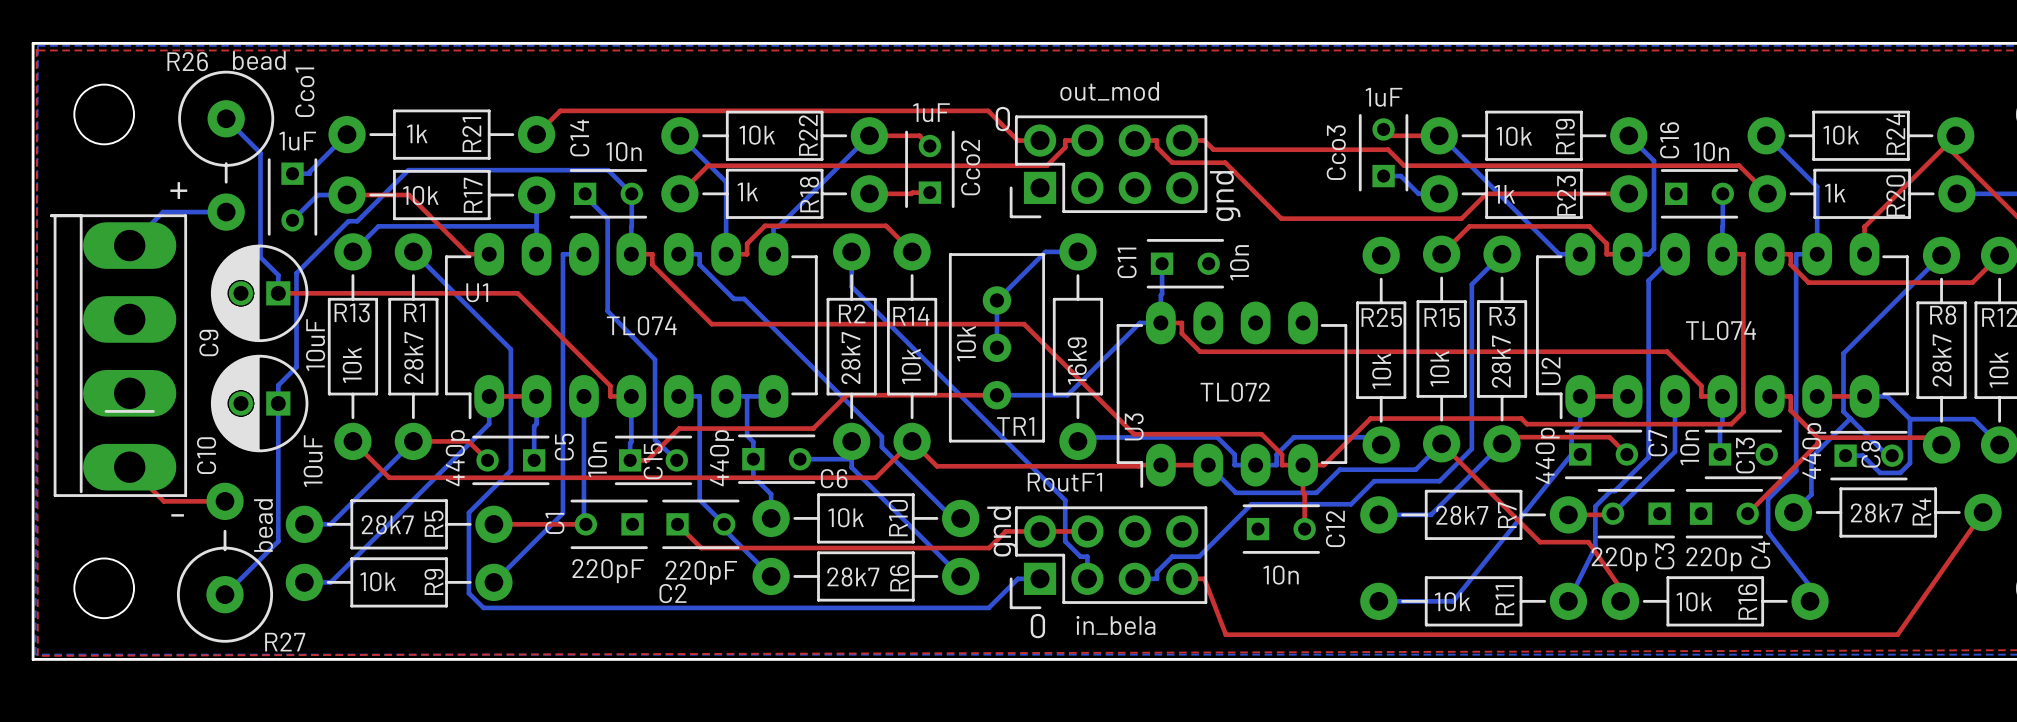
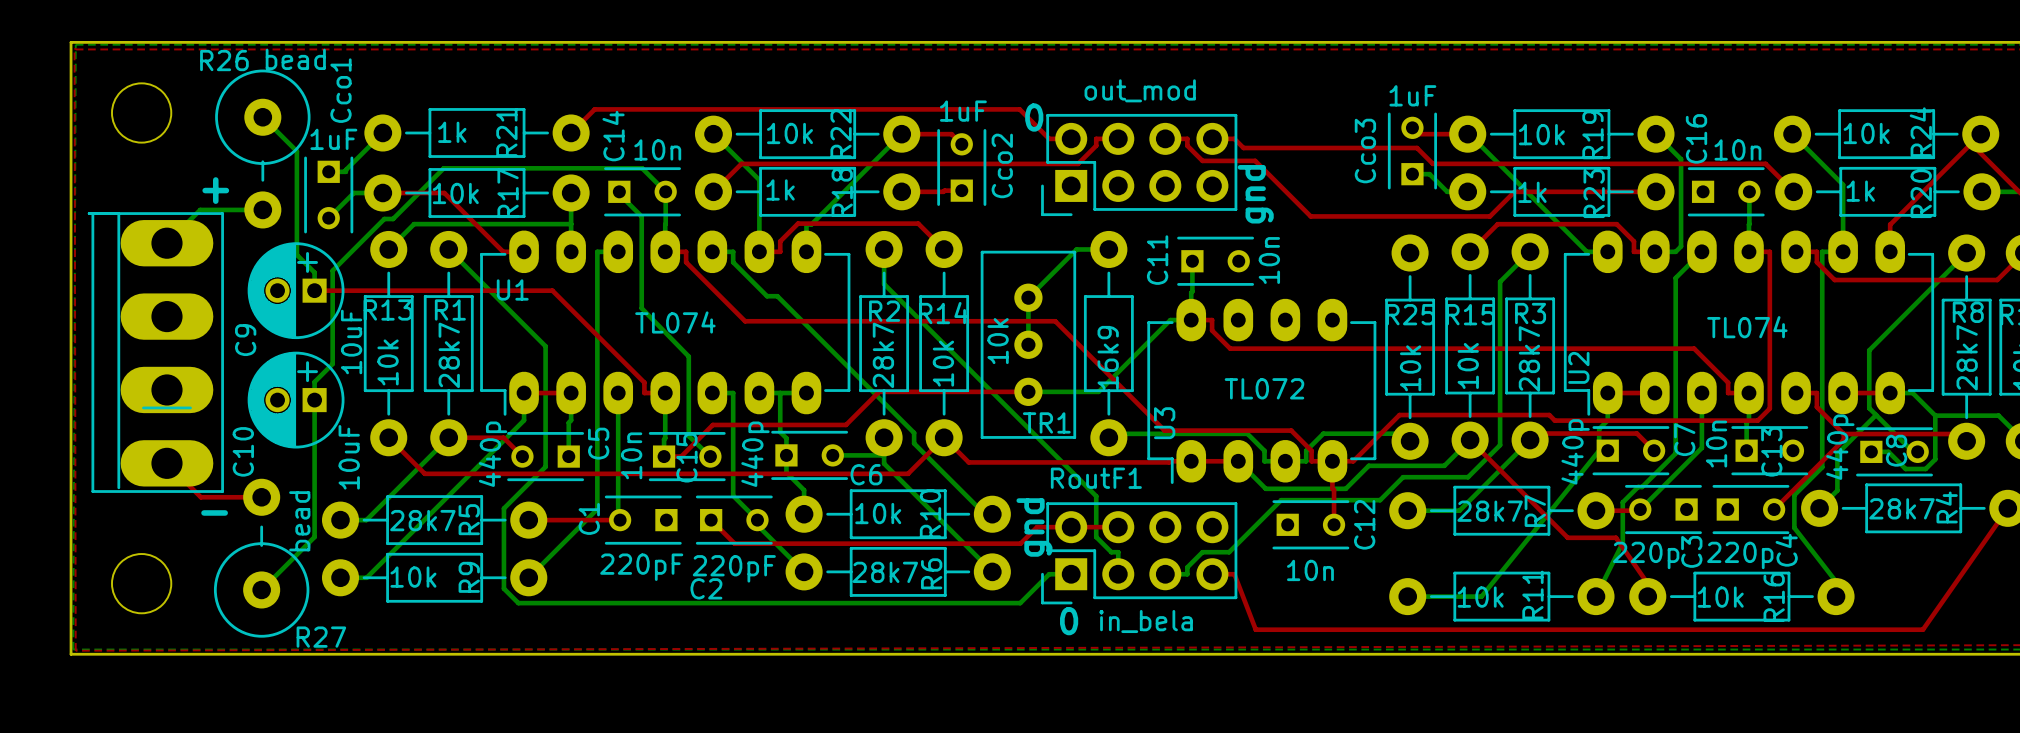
text: none -> + (307, 262)
text: none -> + (307, 371)

